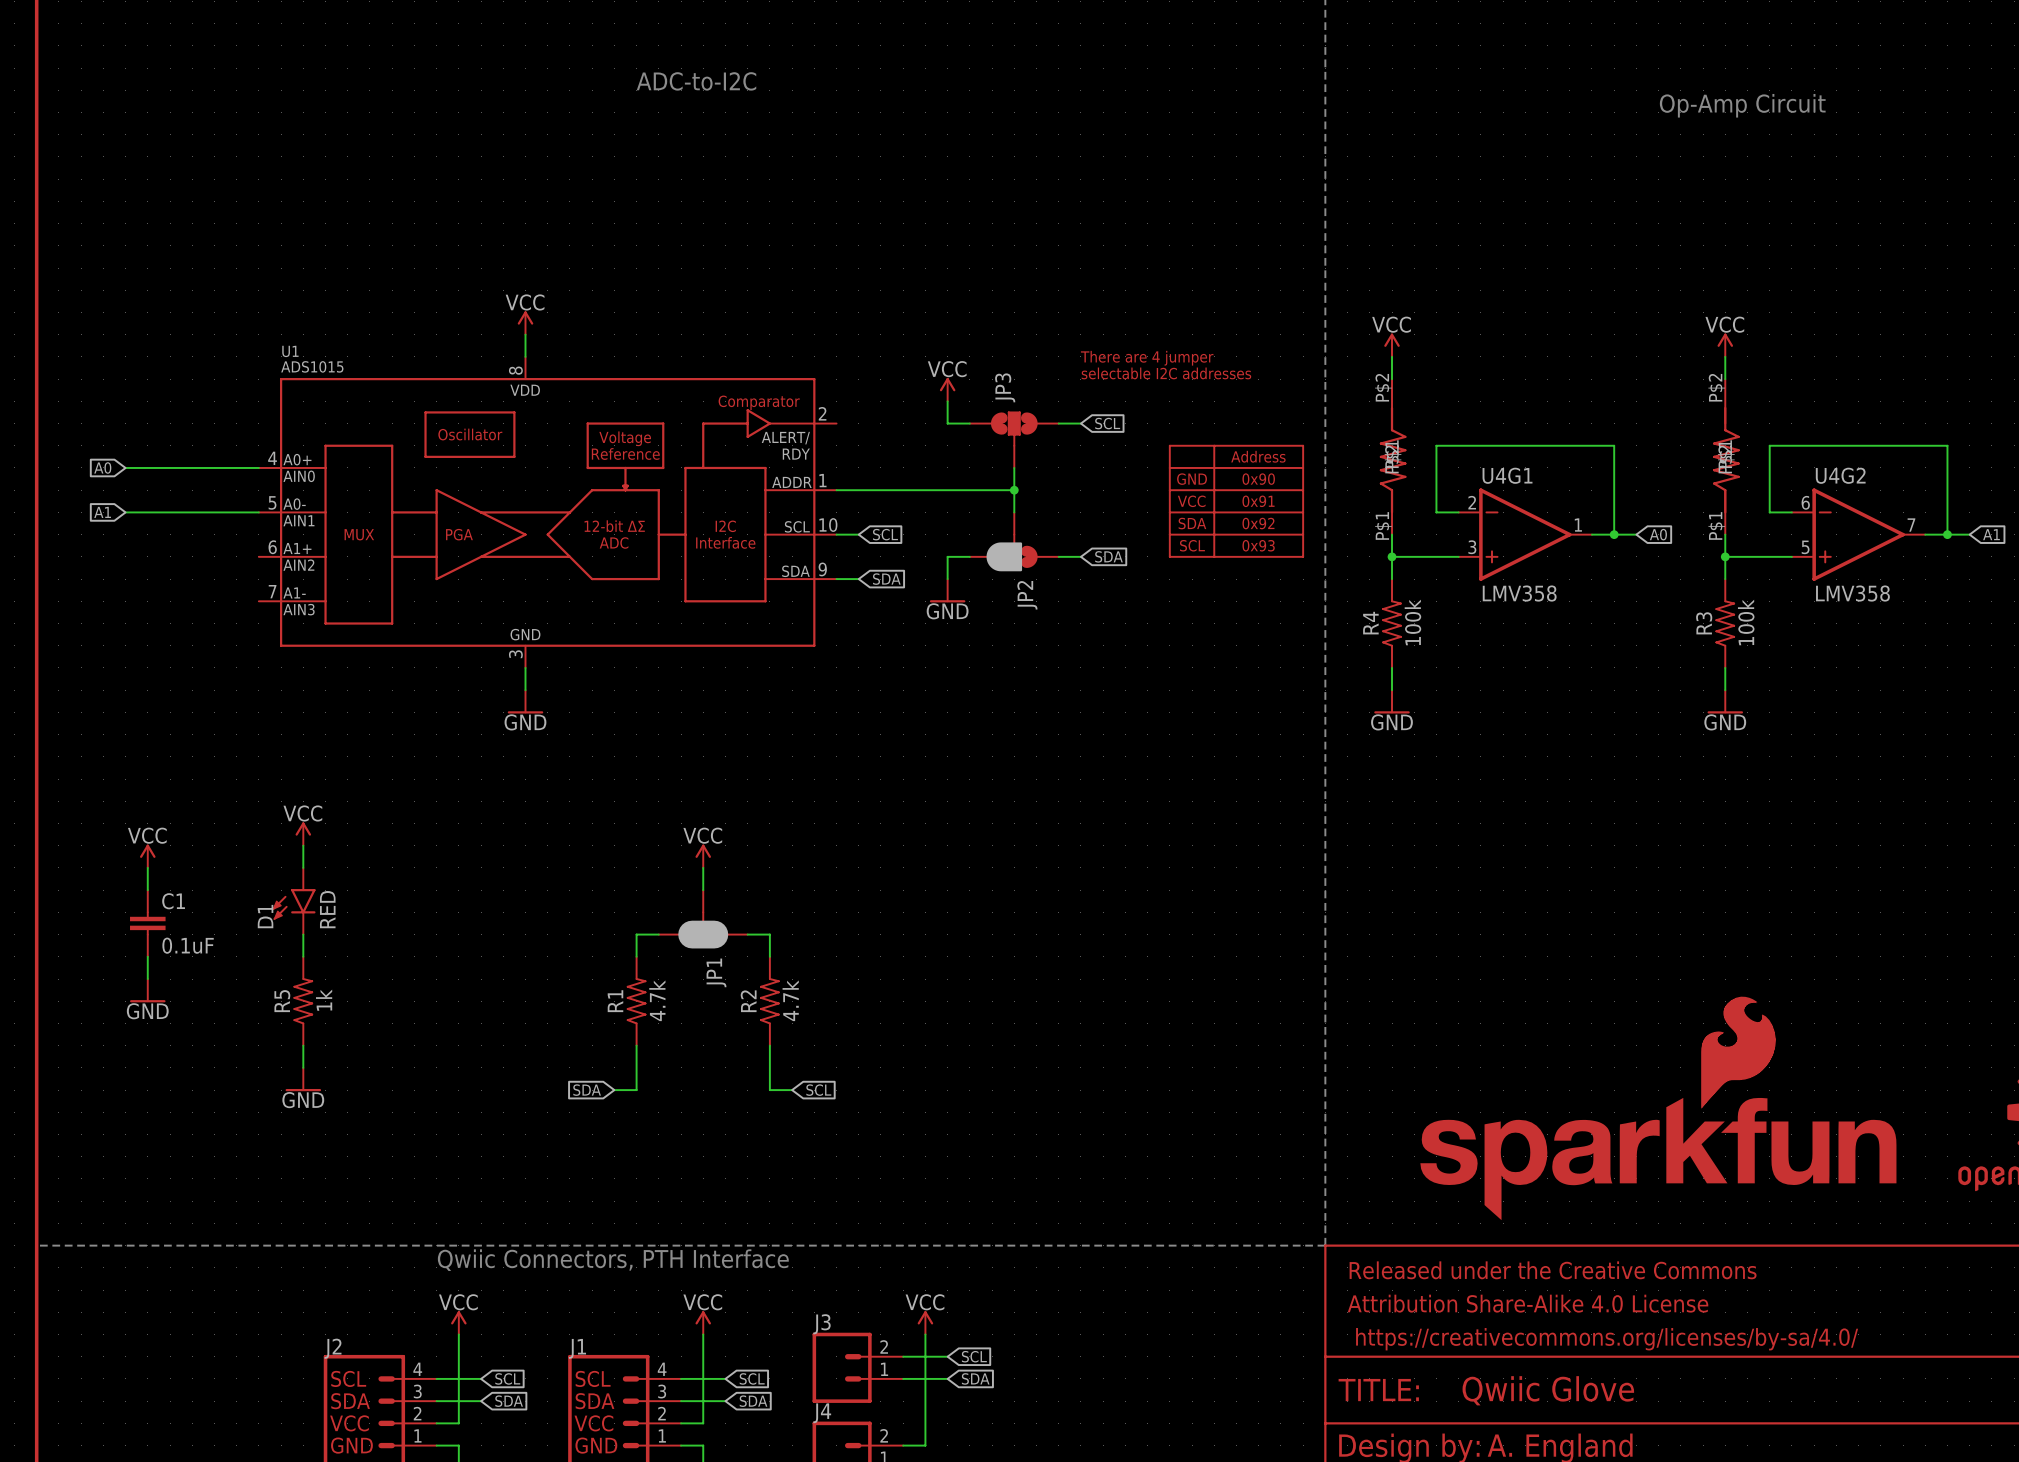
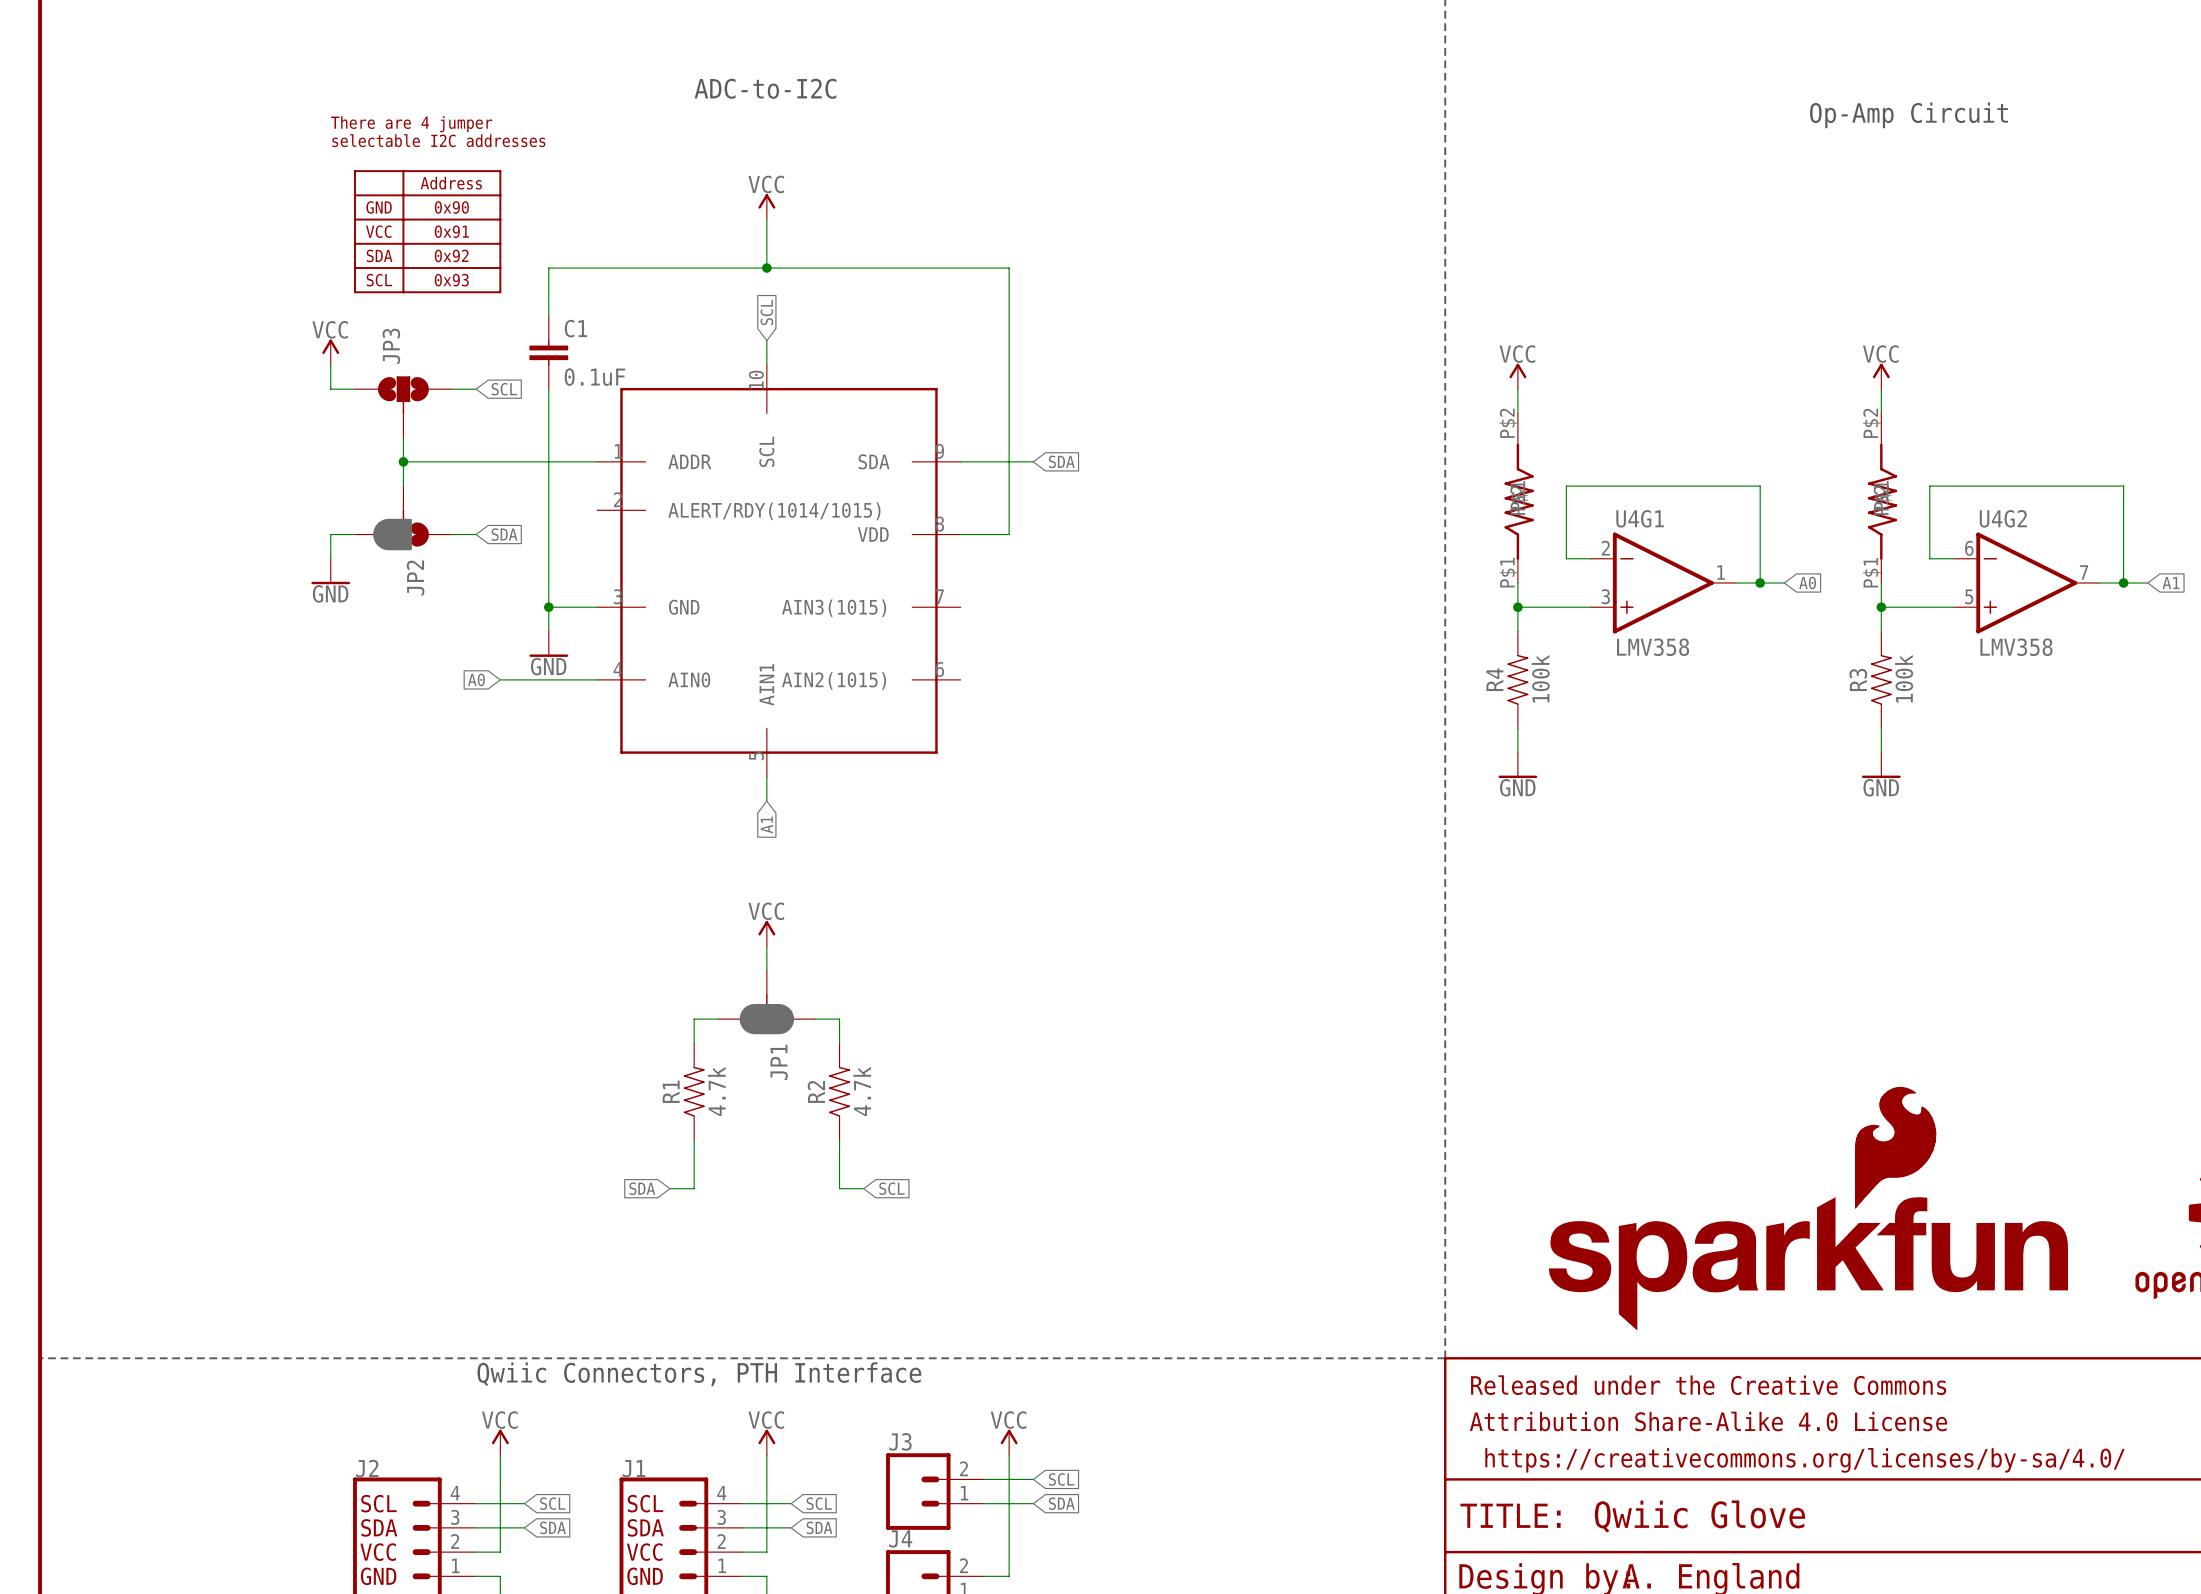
text: none -> There are 4 jumper (411, 124)
text: none -> selectable I2C addresses (438, 140)
line: none -> (354, 171) (354, 292) (500, 292) (500, 171) (354, 171)
line: none -> (403, 171) (403, 292)
text: none -> Address (451, 183)
line: none -> (354, 195) (500, 195)
power symbol: none -> VCC (766, 206)
text: none -> GND (379, 207)
text: none -> 0x90 (451, 207)
line: none -> (354, 219) (500, 219)
wire: none -> (766, 219) (766, 268)
text: none -> VCC (378, 231)
text: none -> 0x91 (451, 231)
line: none -> (354, 243) (500, 243)
text: none -> SDA (379, 255)
text: none -> 0x92 (451, 255)
line: none -> (354, 268) (500, 268)
junction: none -> (766, 268)
text: none -> SCL (379, 280)
text: none -> 0x93 (451, 280)
global label: none -> SCL (766, 312)
power symbol: none -> VCC (330, 352)
power symbol: VCC (525, 323) -> none
wire: none -> (330, 364) (330, 389) (354, 389)
wire: (525, 334) (525, 356) -> (766, 340) (766, 364)
wire: none -> (451, 389) (476, 389)
global label: none -> SCL (504, 389)
wire: none -> (548, 389) (548, 631)
text: There are 4 jumper (1147, 358) -> none
text: selectable I2C addresses (1166, 373) -> none
power symbol: VCC (947, 389) -> none
wire: none -> (403, 437) (403, 486)
wire: (947, 401) (947, 423) (969, 423) -> none
wire: none -> (403, 461) (597, 461)
junction: none -> (403, 461)
wire: none -> (960, 461) (1033, 461)
global label: none -> SDA (1061, 461)
wire: (1058, 423) (1080, 423) -> none
global label: SCL (1107, 423) -> none
JP3 position: (1014, 439) -> (403, 406)
line: (1169, 445) (1169, 556) (1303, 556) (1303, 445) (1169, 445) -> none
line: (1214, 445) (1214, 556) -> none
text: Address (1258, 456) -> none
global label: A0 (102, 467) -> none
wire: (125, 467) (258, 467) -> none
wire: (1014, 467) (1014, 512) -> none
line: (1169, 467) (1303, 467) -> none
text: GND (1192, 479) -> none
text: 0x90 (1258, 479) -> none
wire: none -> (354, 534) (330, 534) (330, 558)
wire: none -> (451, 534) (476, 534)
global label: none -> SDA (504, 534)
wire: (925, 490) (1014, 490) -> (1009, 534) (1009, 268) (548, 268) (548, 316)
junction: (1014, 490) -> none
line: (1169, 490) (1303, 490) -> none
text: VCC (1191, 501) -> none
text: 0x91 (1258, 501) -> none
global label: A1 (102, 512) -> none
wire: (125, 512) (258, 512) -> none
U1: ADS1015 (547, 512) -> none
line: (1169, 512) (1303, 512) -> none
part: none -> (778, 570)
text: SDA (1192, 523) -> none
text: 0x92 (1258, 523) -> none
power symbol: none -> GND (330, 571)
wire: (836, 534) (858, 534) -> none
global label: SCL (885, 534) -> none
line: (1169, 534) (1303, 534) -> none
JP2 position: (1014, 541) -> (403, 518)
text: SCL (1192, 545) -> none
text: 0x93 (1258, 545) -> none
junction: none -> (548, 607)
wire: (969, 556) (947, 556) (947, 579) -> none
wire: (1058, 556) (1080, 556) -> none
global label: SDA (1109, 556) -> none
wire: (836, 579) (858, 579) -> none
global label: SDA (886, 579) -> none
power symbol: GND (947, 590) -> none
global label: none -> A0 (476, 679)
wire: none -> (500, 679) (597, 679)
wire: (525, 667) (525, 690) -> (766, 776) (766, 801)
power symbol position: GND (525, 701) -> GND (548, 644)
global label: none -> A1 (766, 824)
power symbol: VCC (303, 834) -> none
wire: (303, 845) (303, 867) -> none
power symbol: VCC (147, 856) -> none
wire: (147, 867) (147, 890) -> none
D1: RED (294, 901) -> none
C1 position: (147, 923) -> (548, 352)
wire: (303, 934) (303, 956) -> none
wire: (147, 956) (147, 979) -> none
power symbol: GND (147, 990) -> none
R5: 1k (303, 1001) -> none
wire: (303, 1045) (303, 1067) -> none
power symbol: GND (303, 1079) -> none

